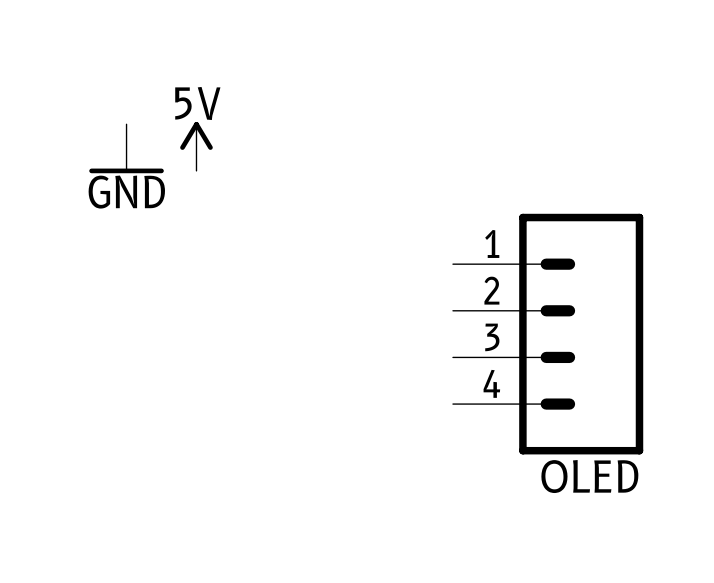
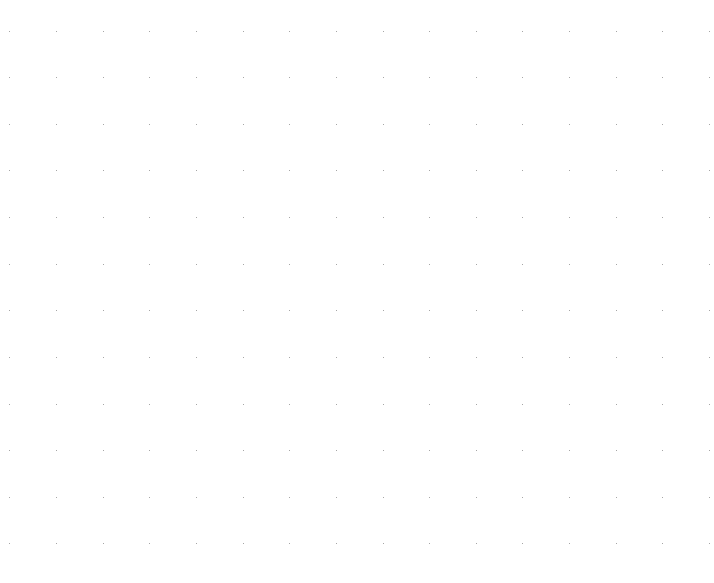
power symbol: 5V (196, 146) -> none
power symbol: GND (126, 148) -> none
OLED: (548, 334) -> none

